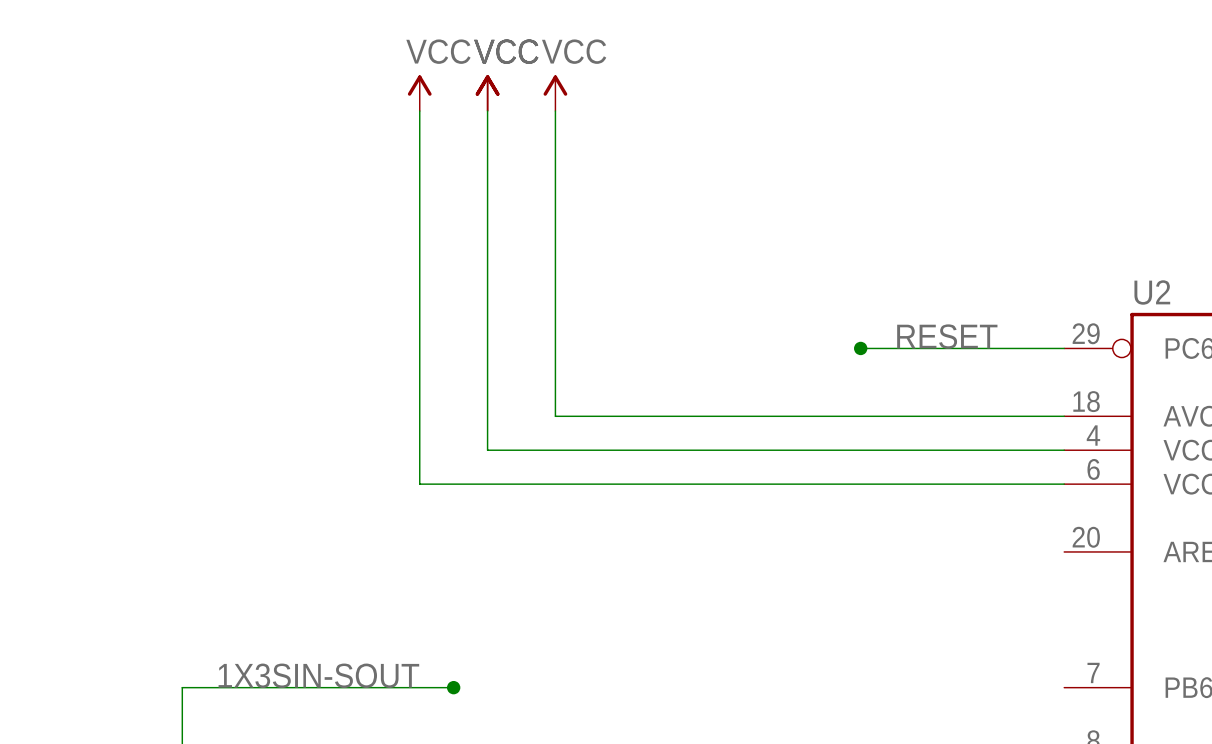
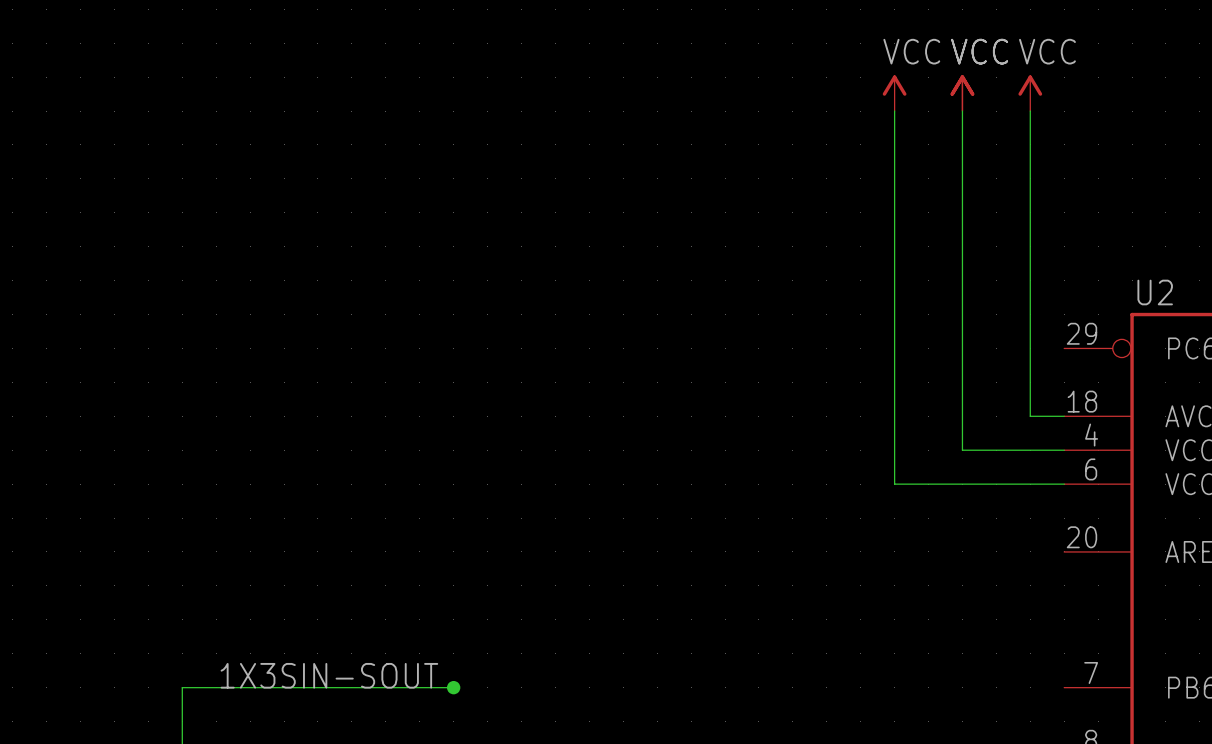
power symbol: VCC (419, 93) -> none
power symbol: VCC (487, 93) -> none
power symbol: VCC (555, 93) -> none
power symbol: none -> VCC (894, 93)
power symbol: none -> VCC (962, 93)
power symbol: none -> VCC (1030, 93)
wire: (419, 111) (419, 484) (894, 484) -> (894, 111) (894, 484)
wire: (487, 111) (487, 450) (962, 450) -> (962, 111) (962, 450)
wire: (555, 111) (555, 416) (1030, 416) -> (1030, 111) (1030, 416)
label: RESET (947, 336) -> none
wire: (860, 348) (1064, 348) -> none
junction: (860, 348) -> none

